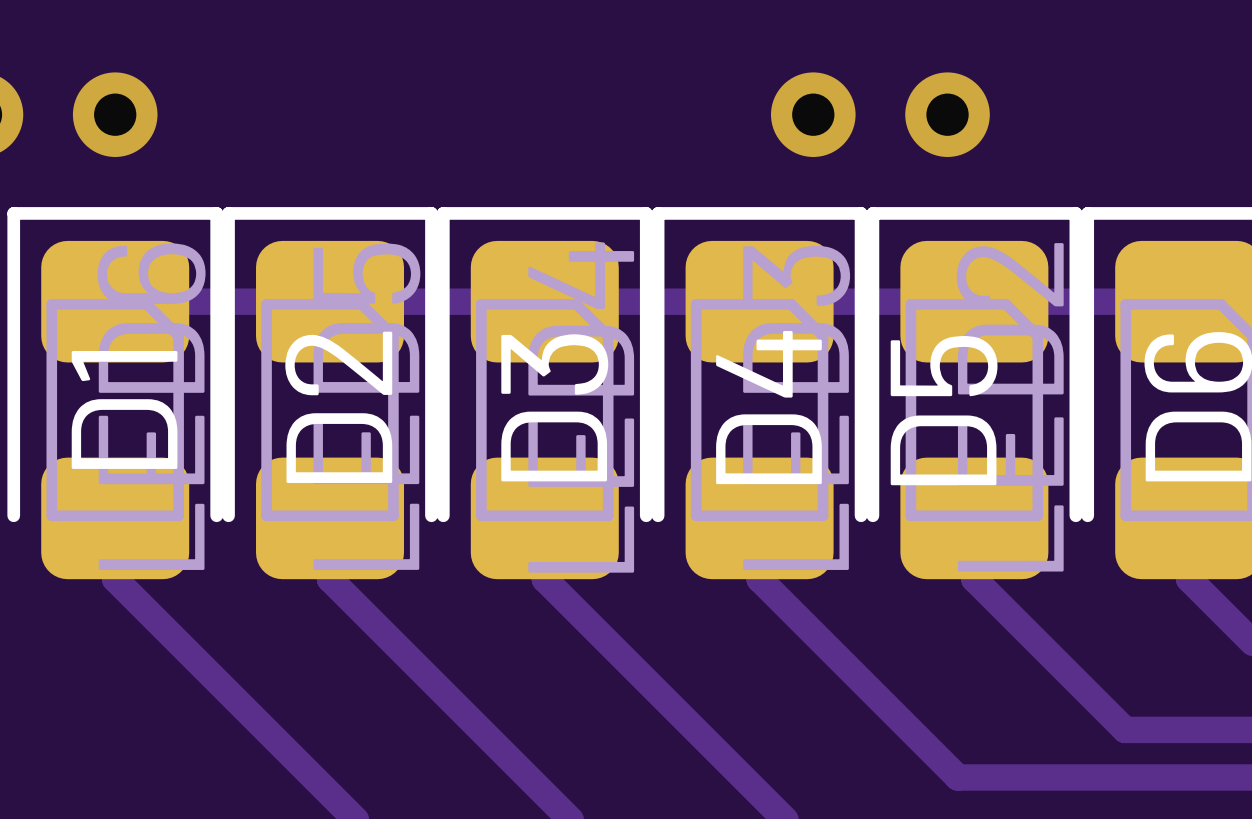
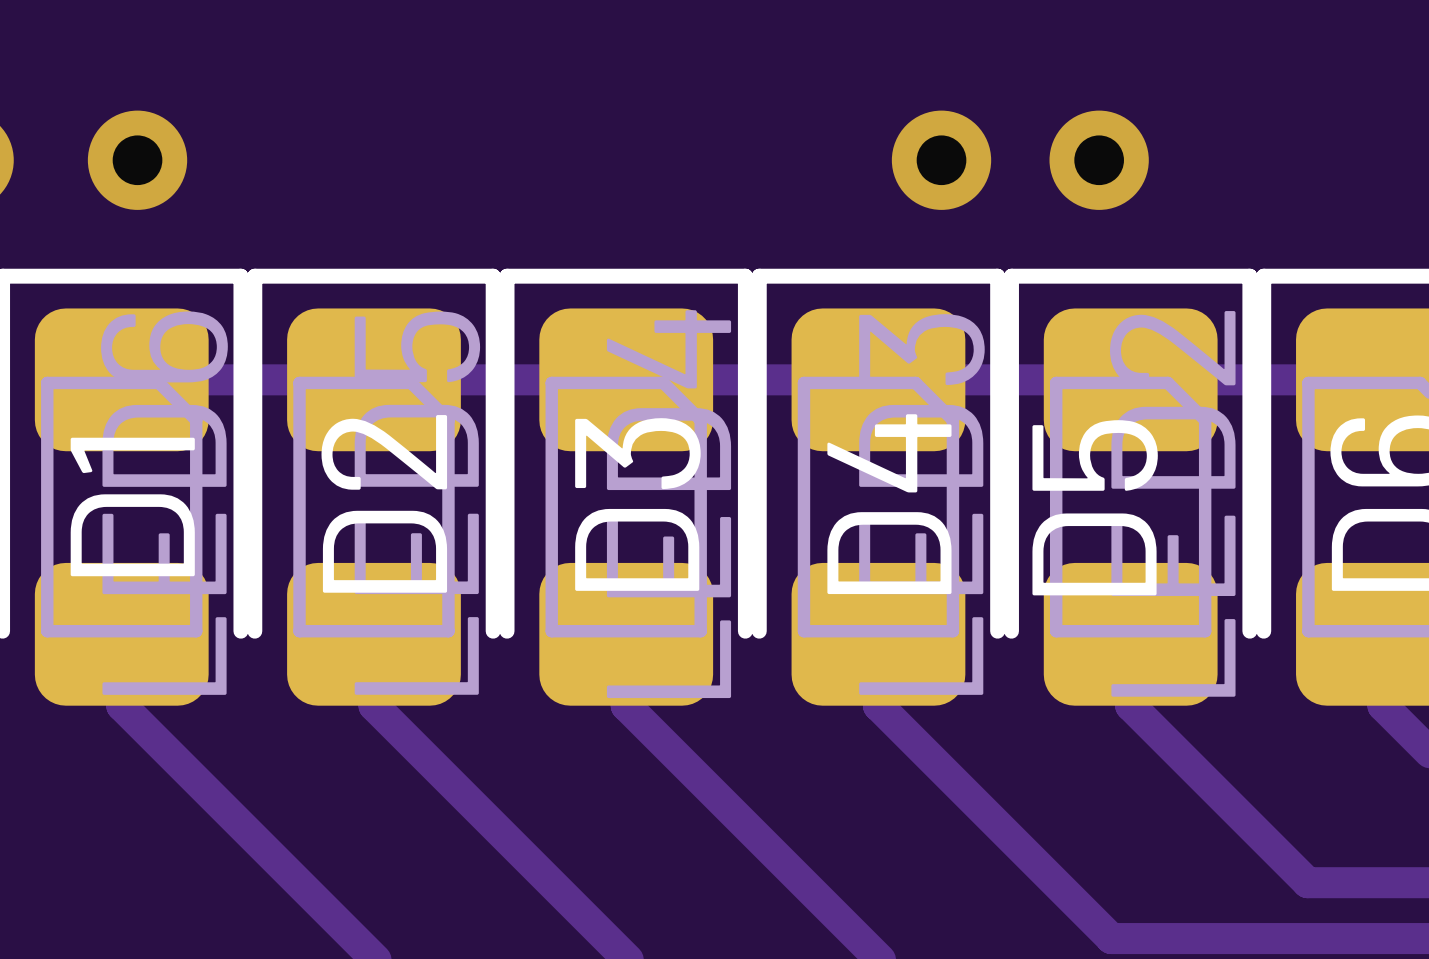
via position: (115, 114) -> (137, 160)

